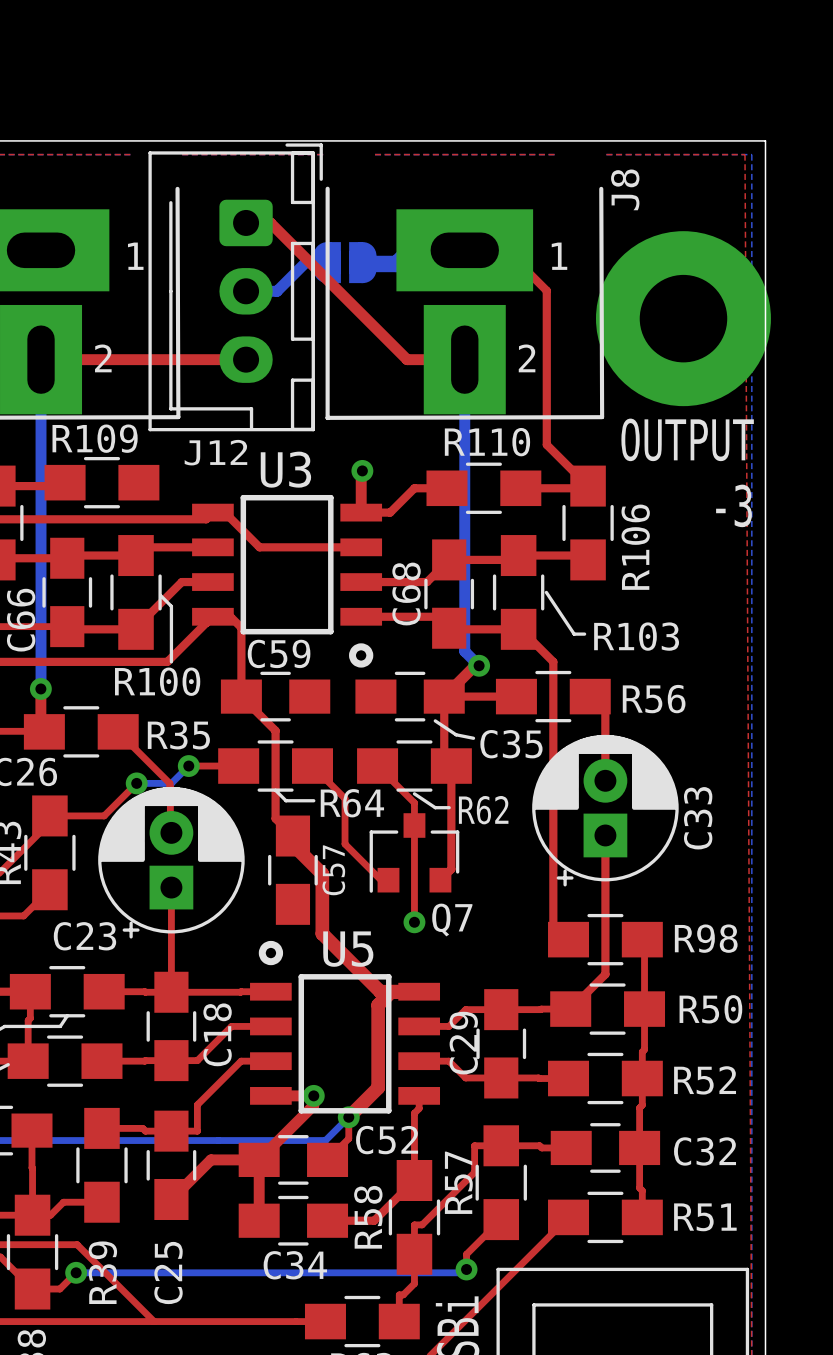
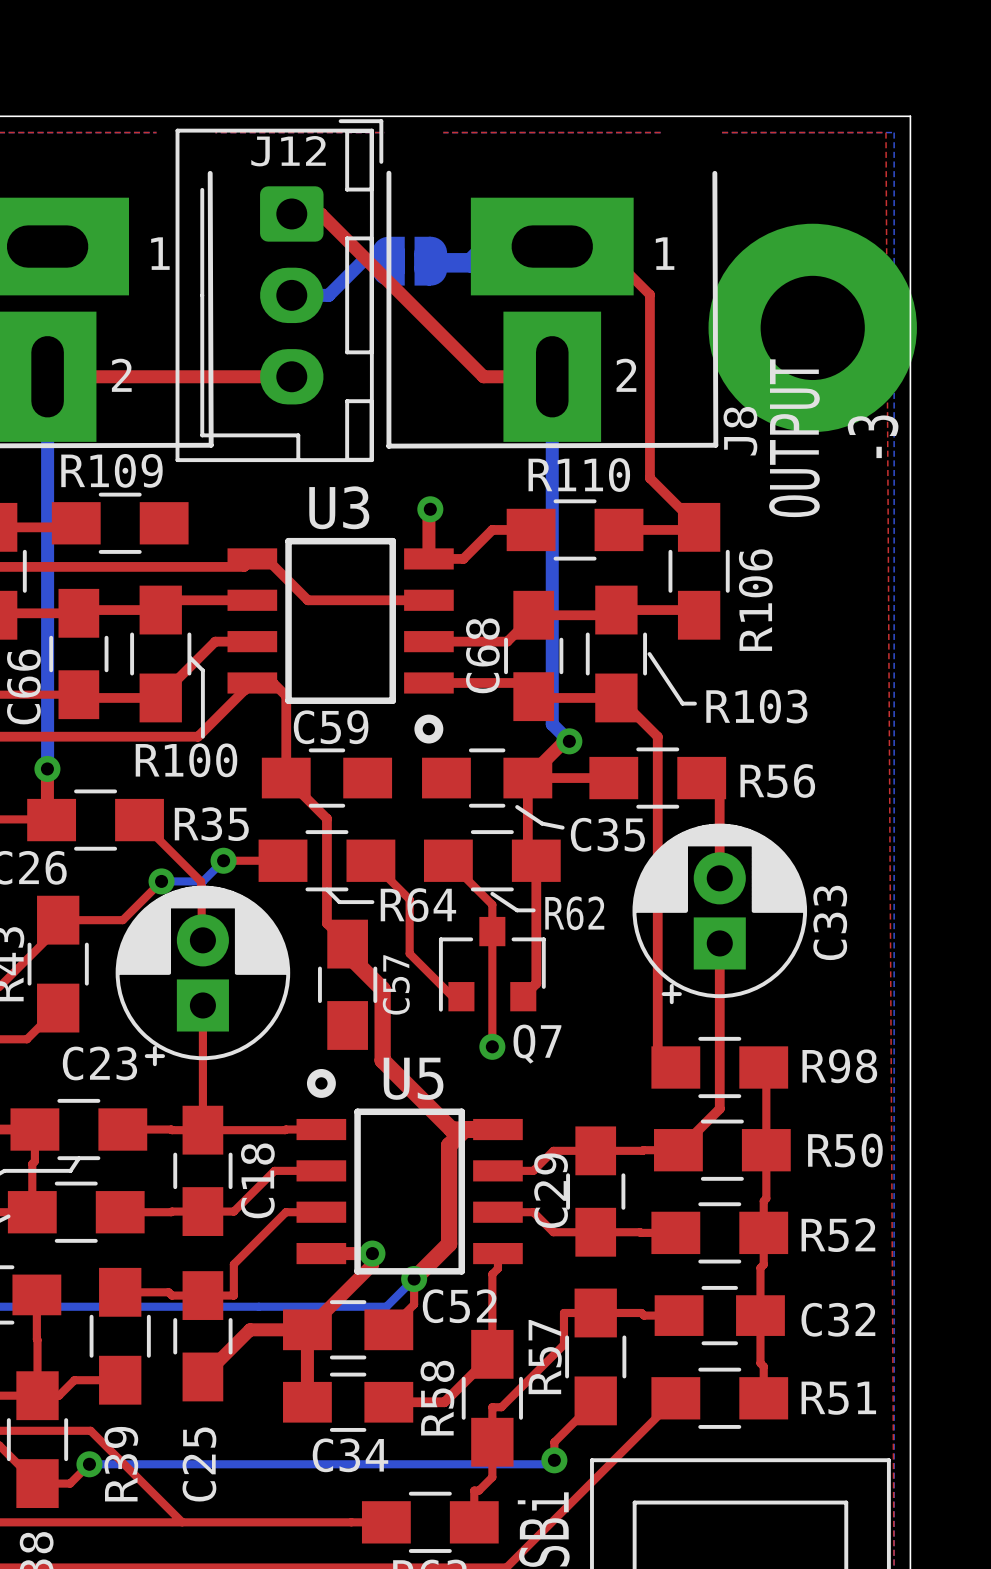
J8 name position: J8 (625, 189) -> J8 (740, 431)
text rotation: 0° (687, 439) -> 90° counterclockwise (794, 438)
J12 name position: J12 (215, 452) -> J12 (288, 151)
text rotation: 0° (734, 505) -> 90° counterclockwise (873, 436)
text position: -3 (734, 505) -> -3 (873, 436)

